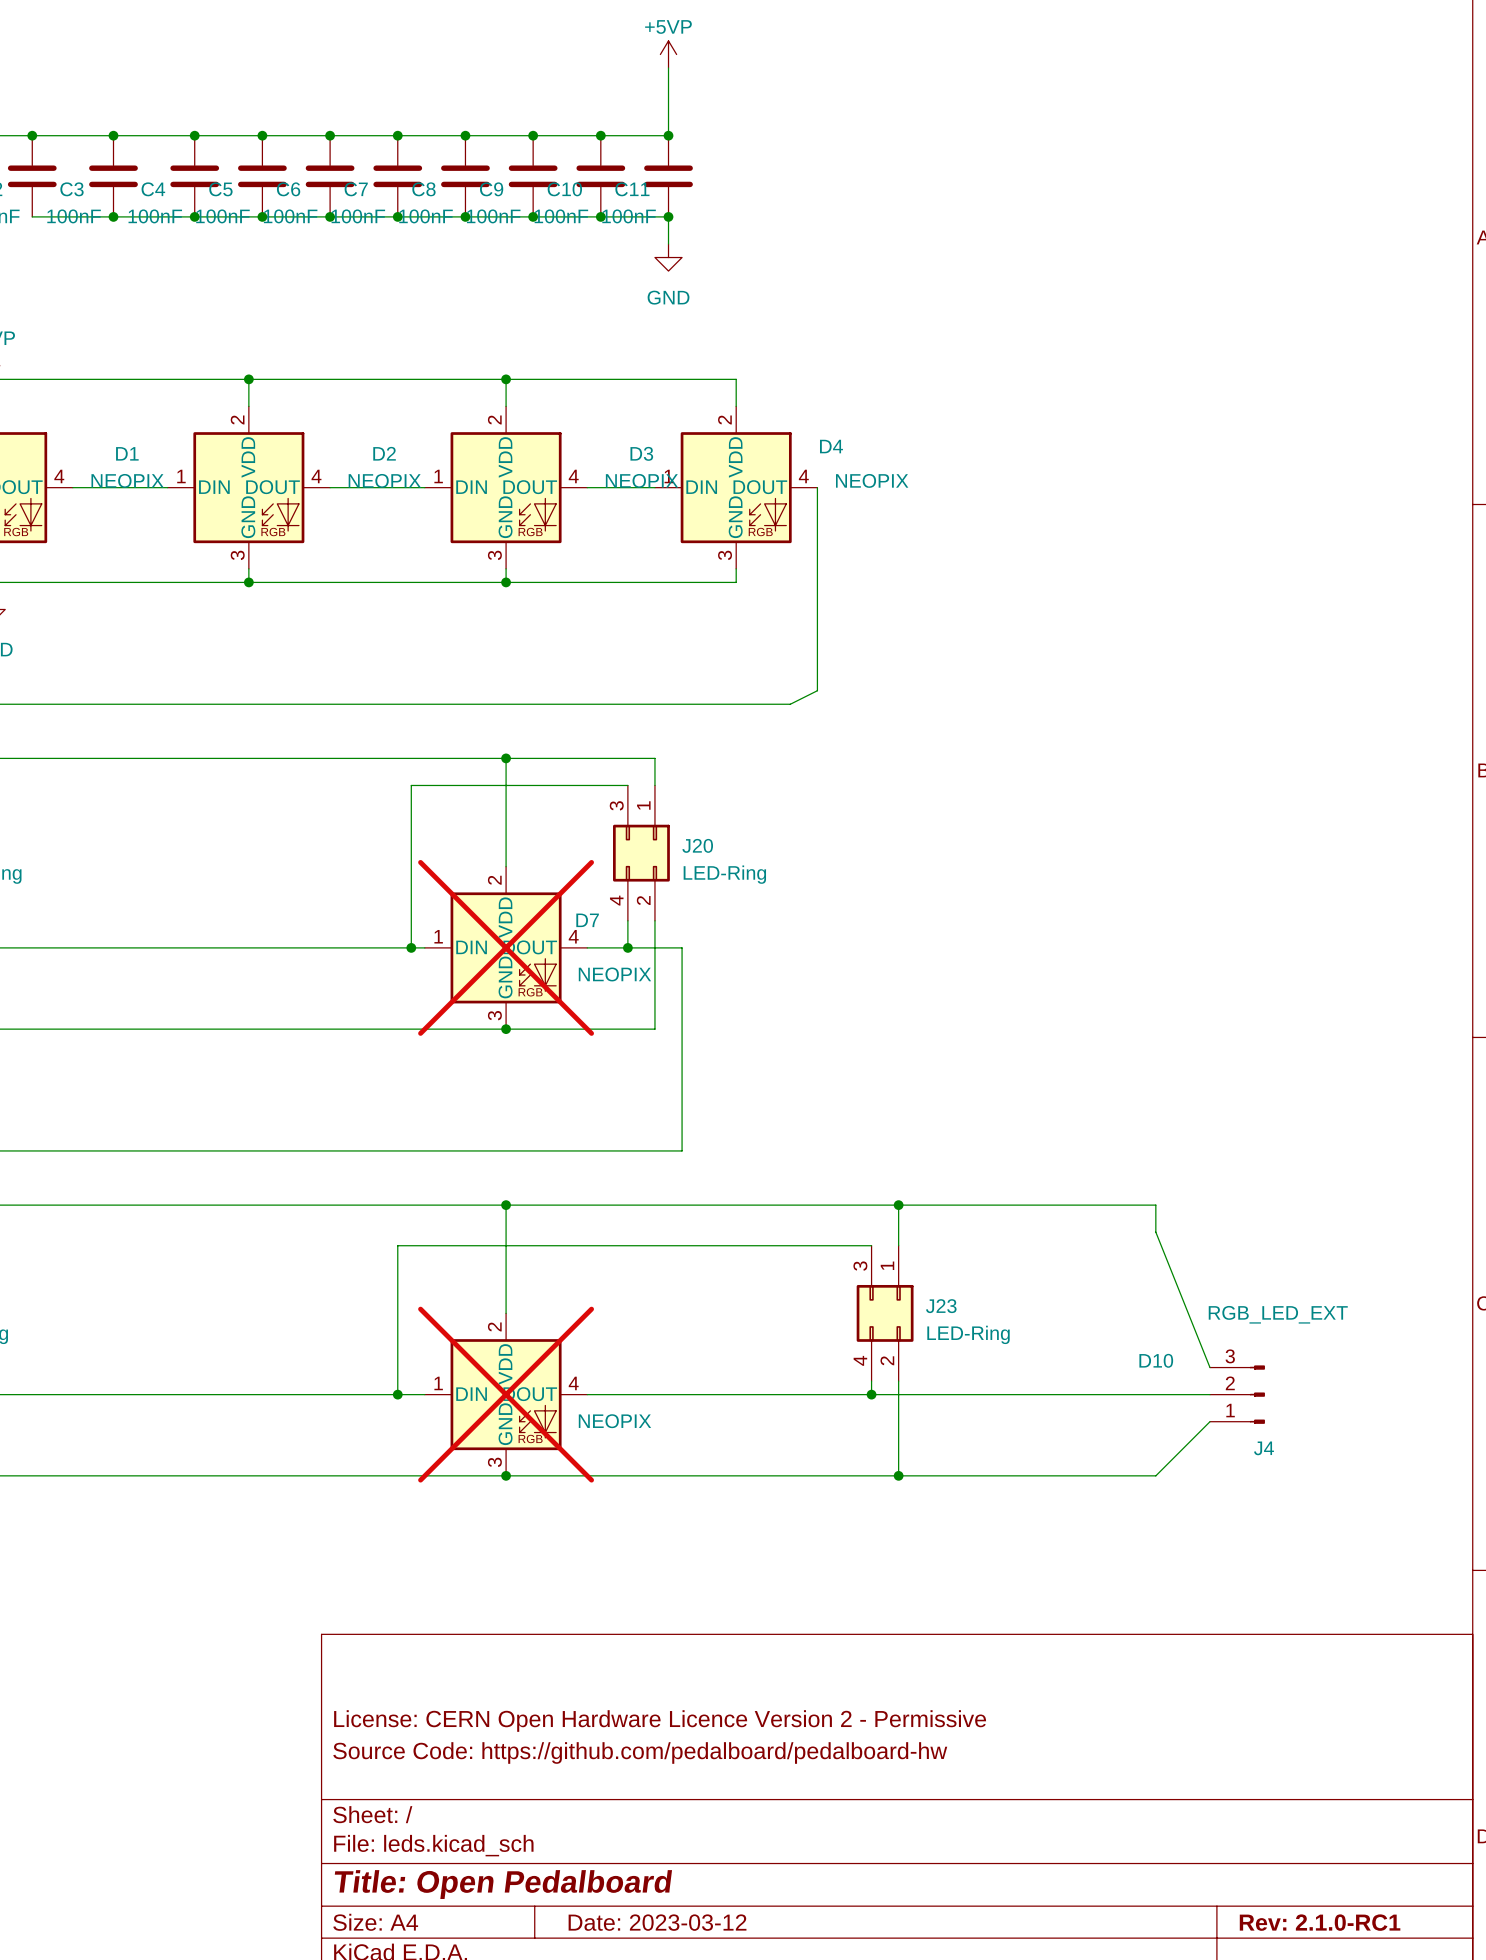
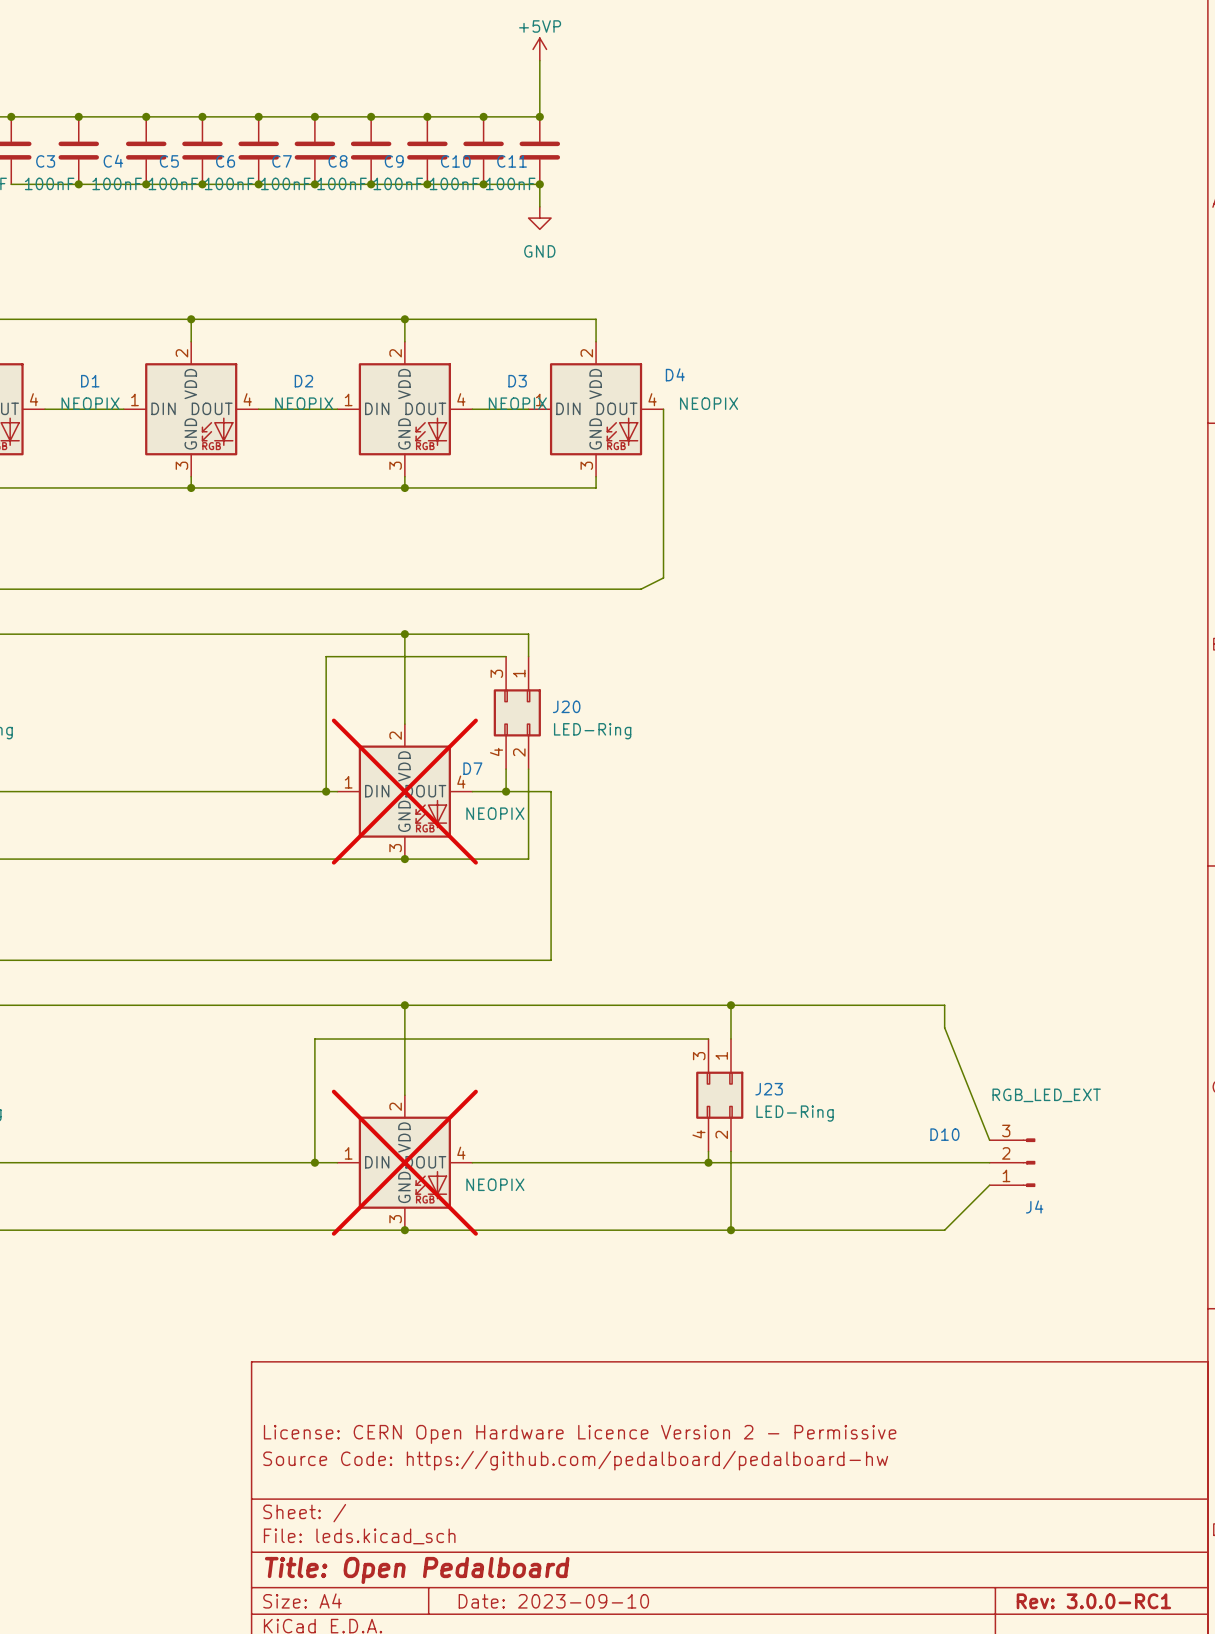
title block: Date: 2023-03-12 (657, 1922) -> Date: 2023-09-10 (553, 1601)
title block: Rev: 2.1.0-RC1 (1320, 1922) -> Rev: 3.0.0-RC1 (1093, 1601)

